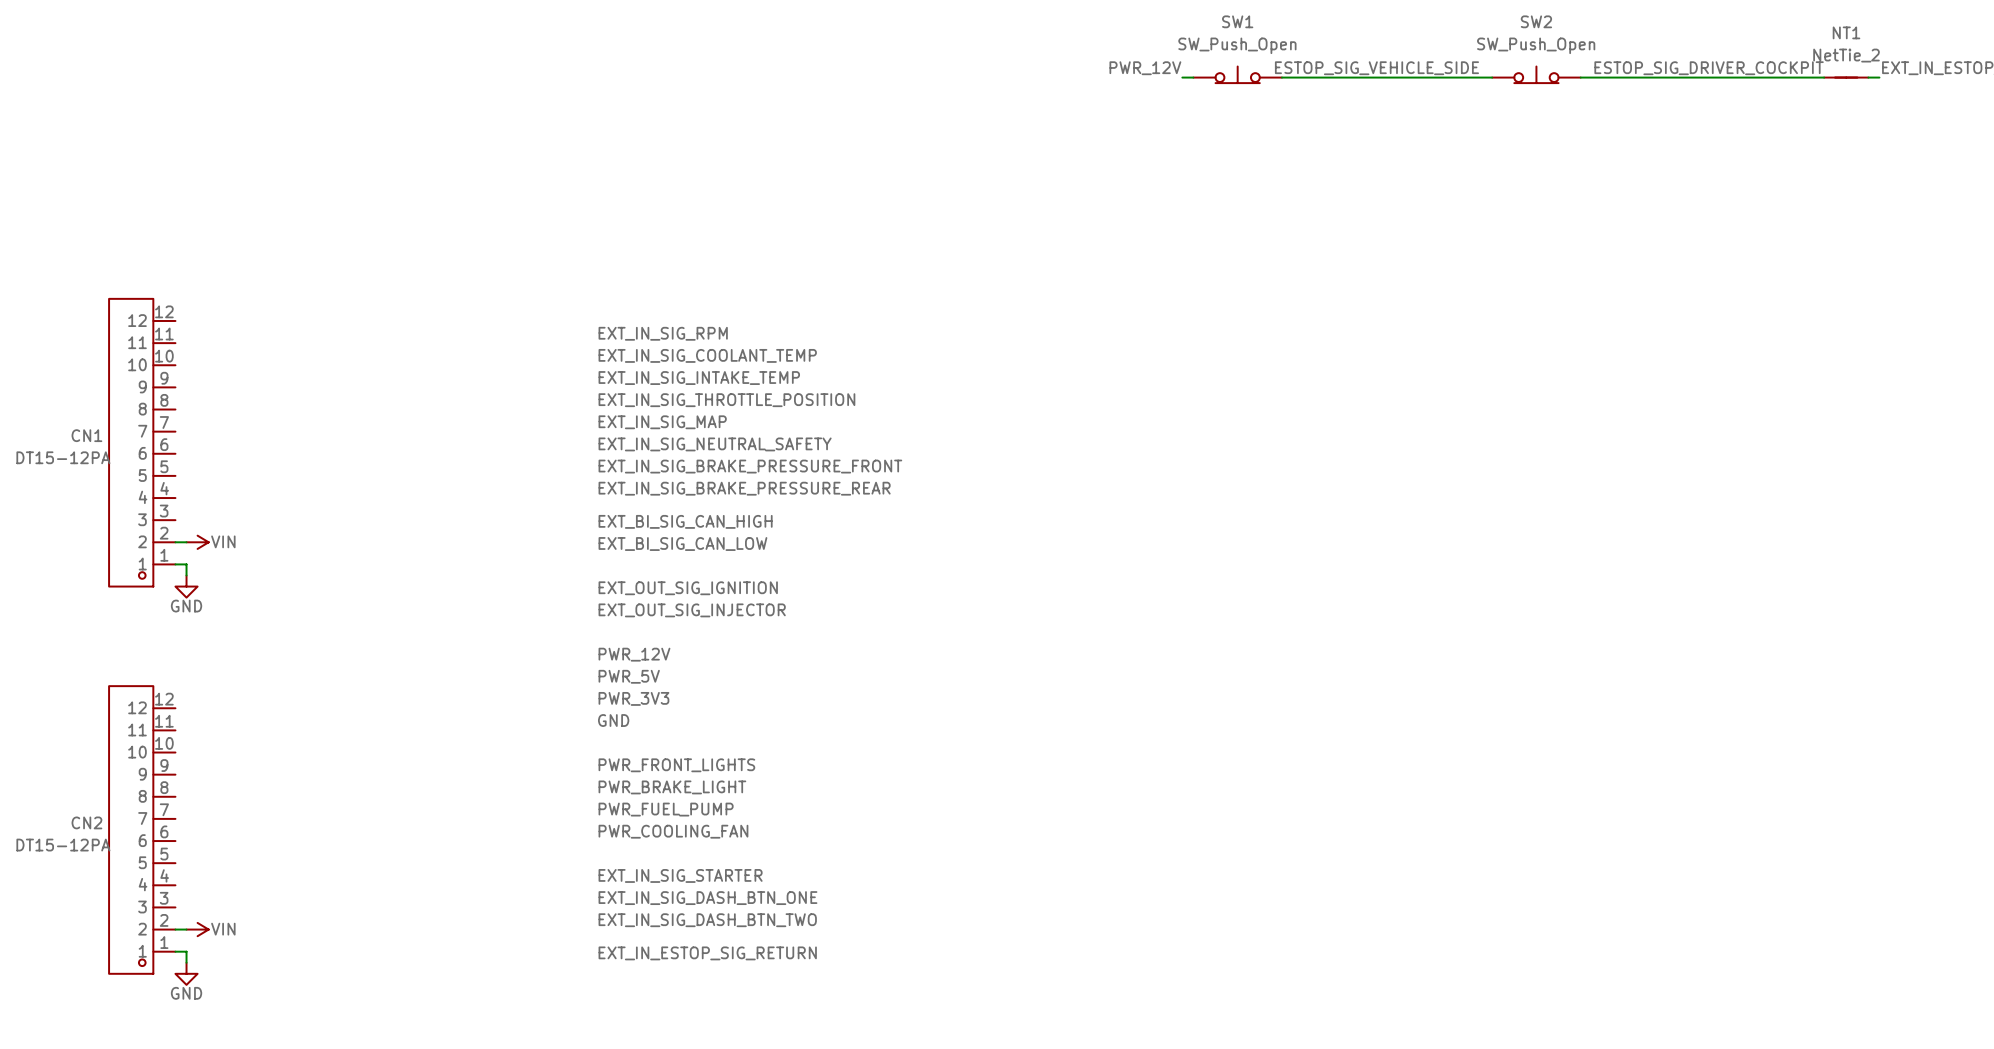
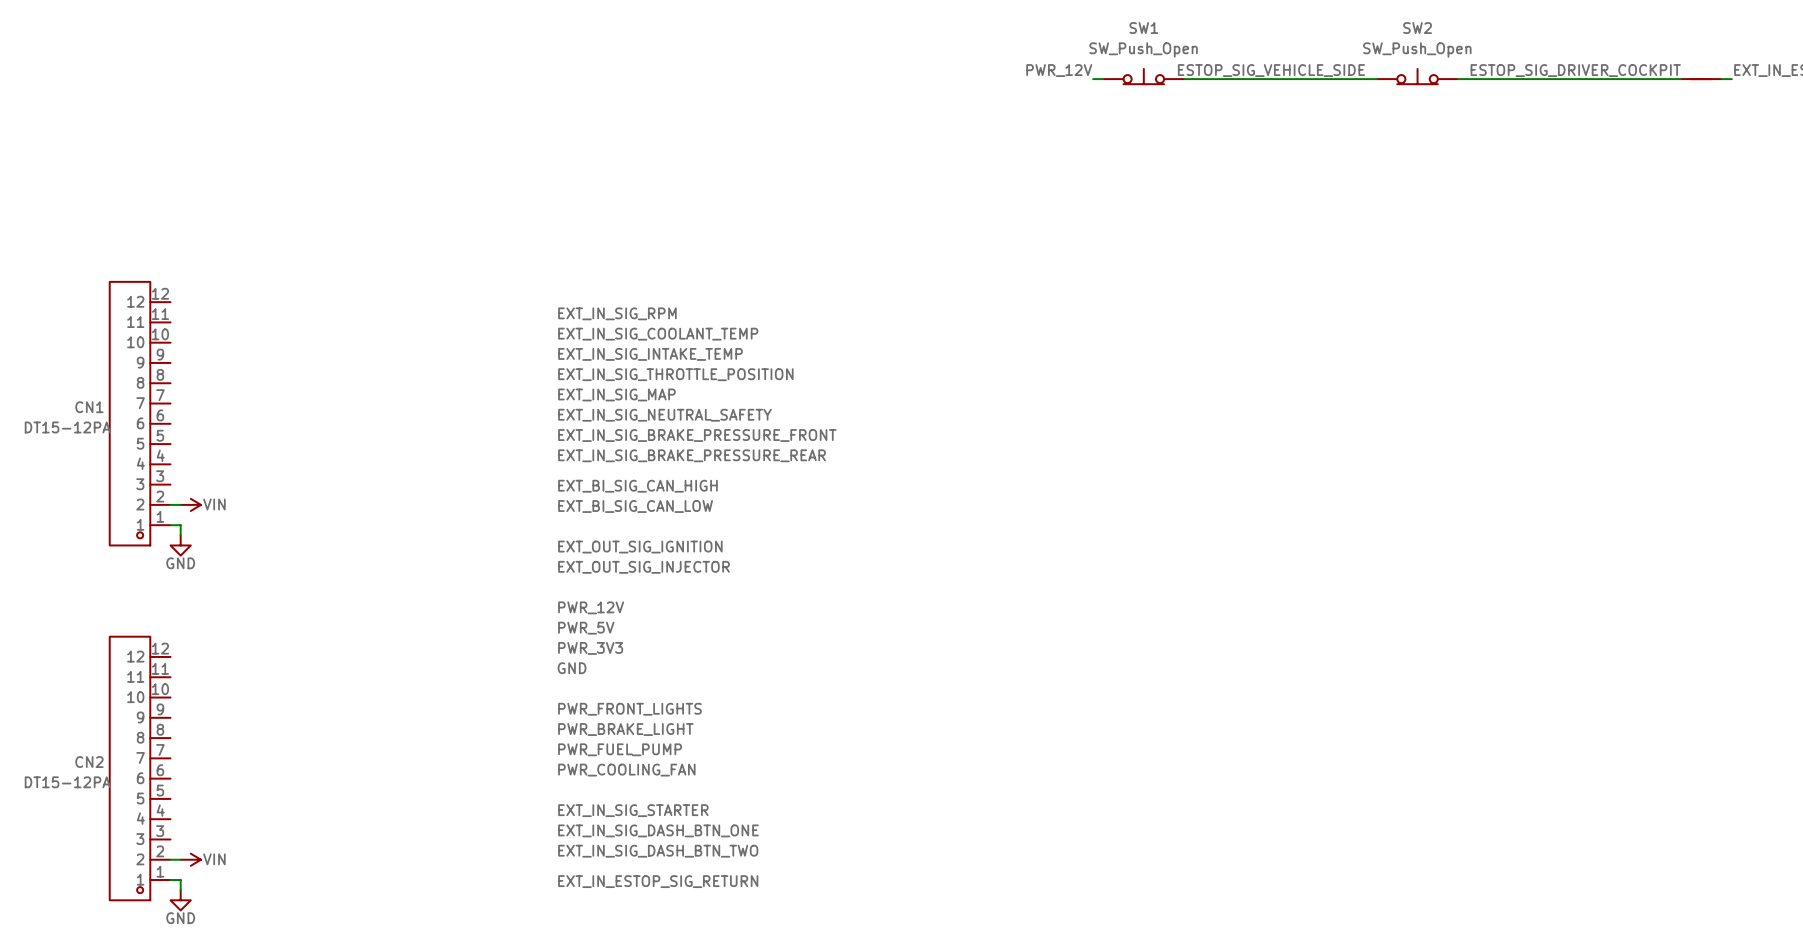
NT1 name: NT1 (1846, 32) -> none
NT1 value: NetTie_2 (1846, 55) -> none

